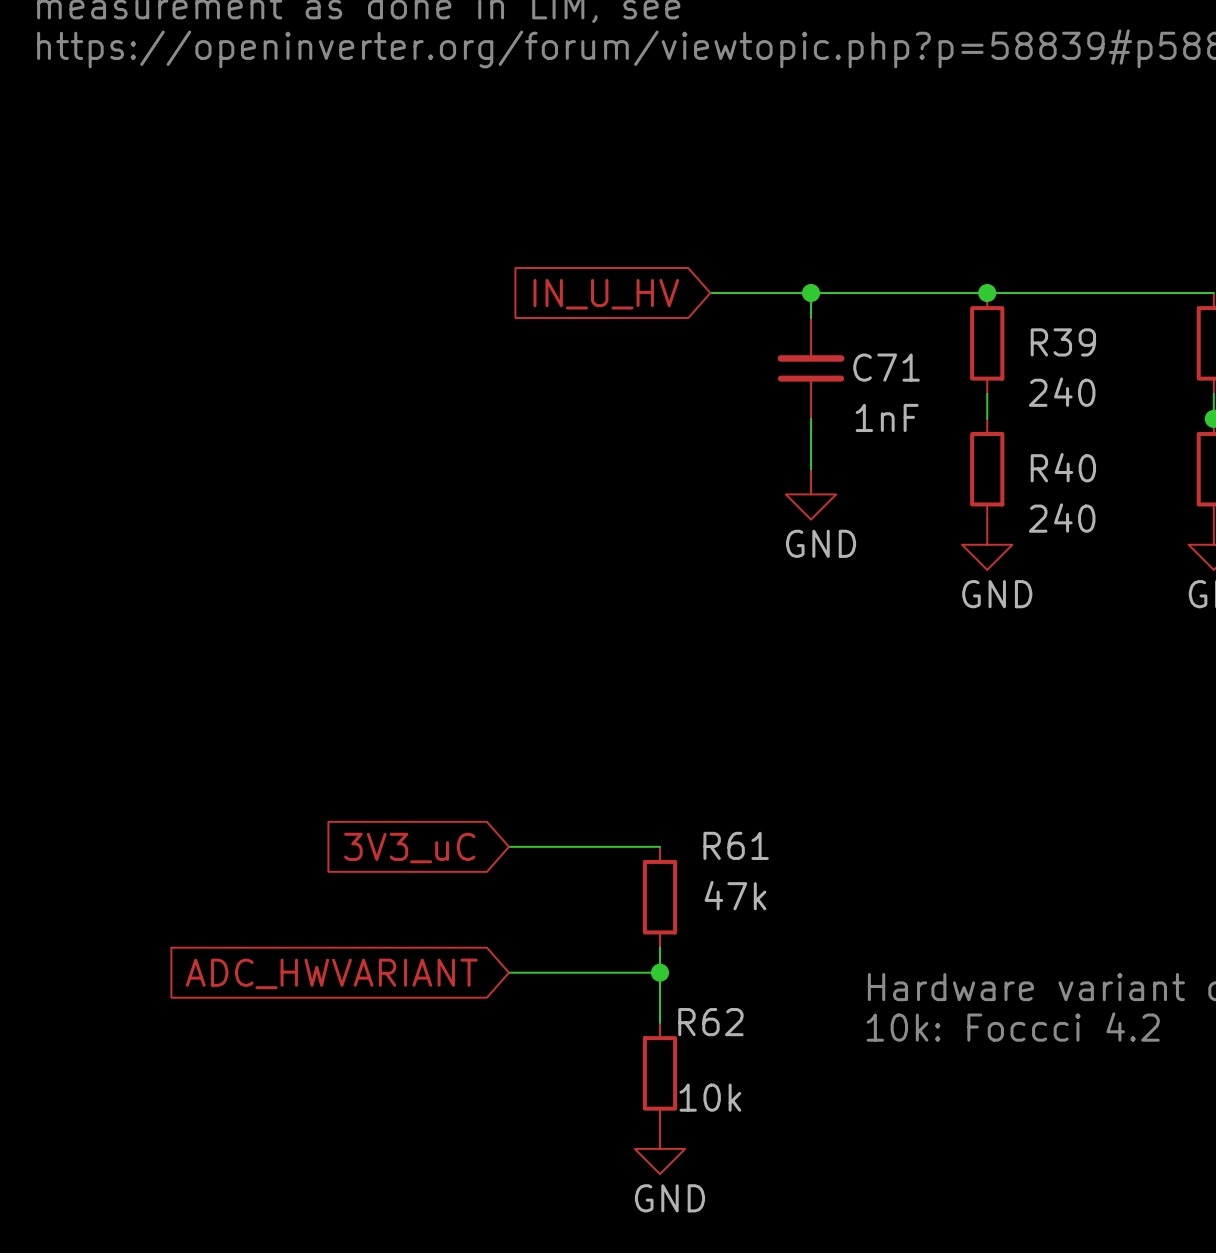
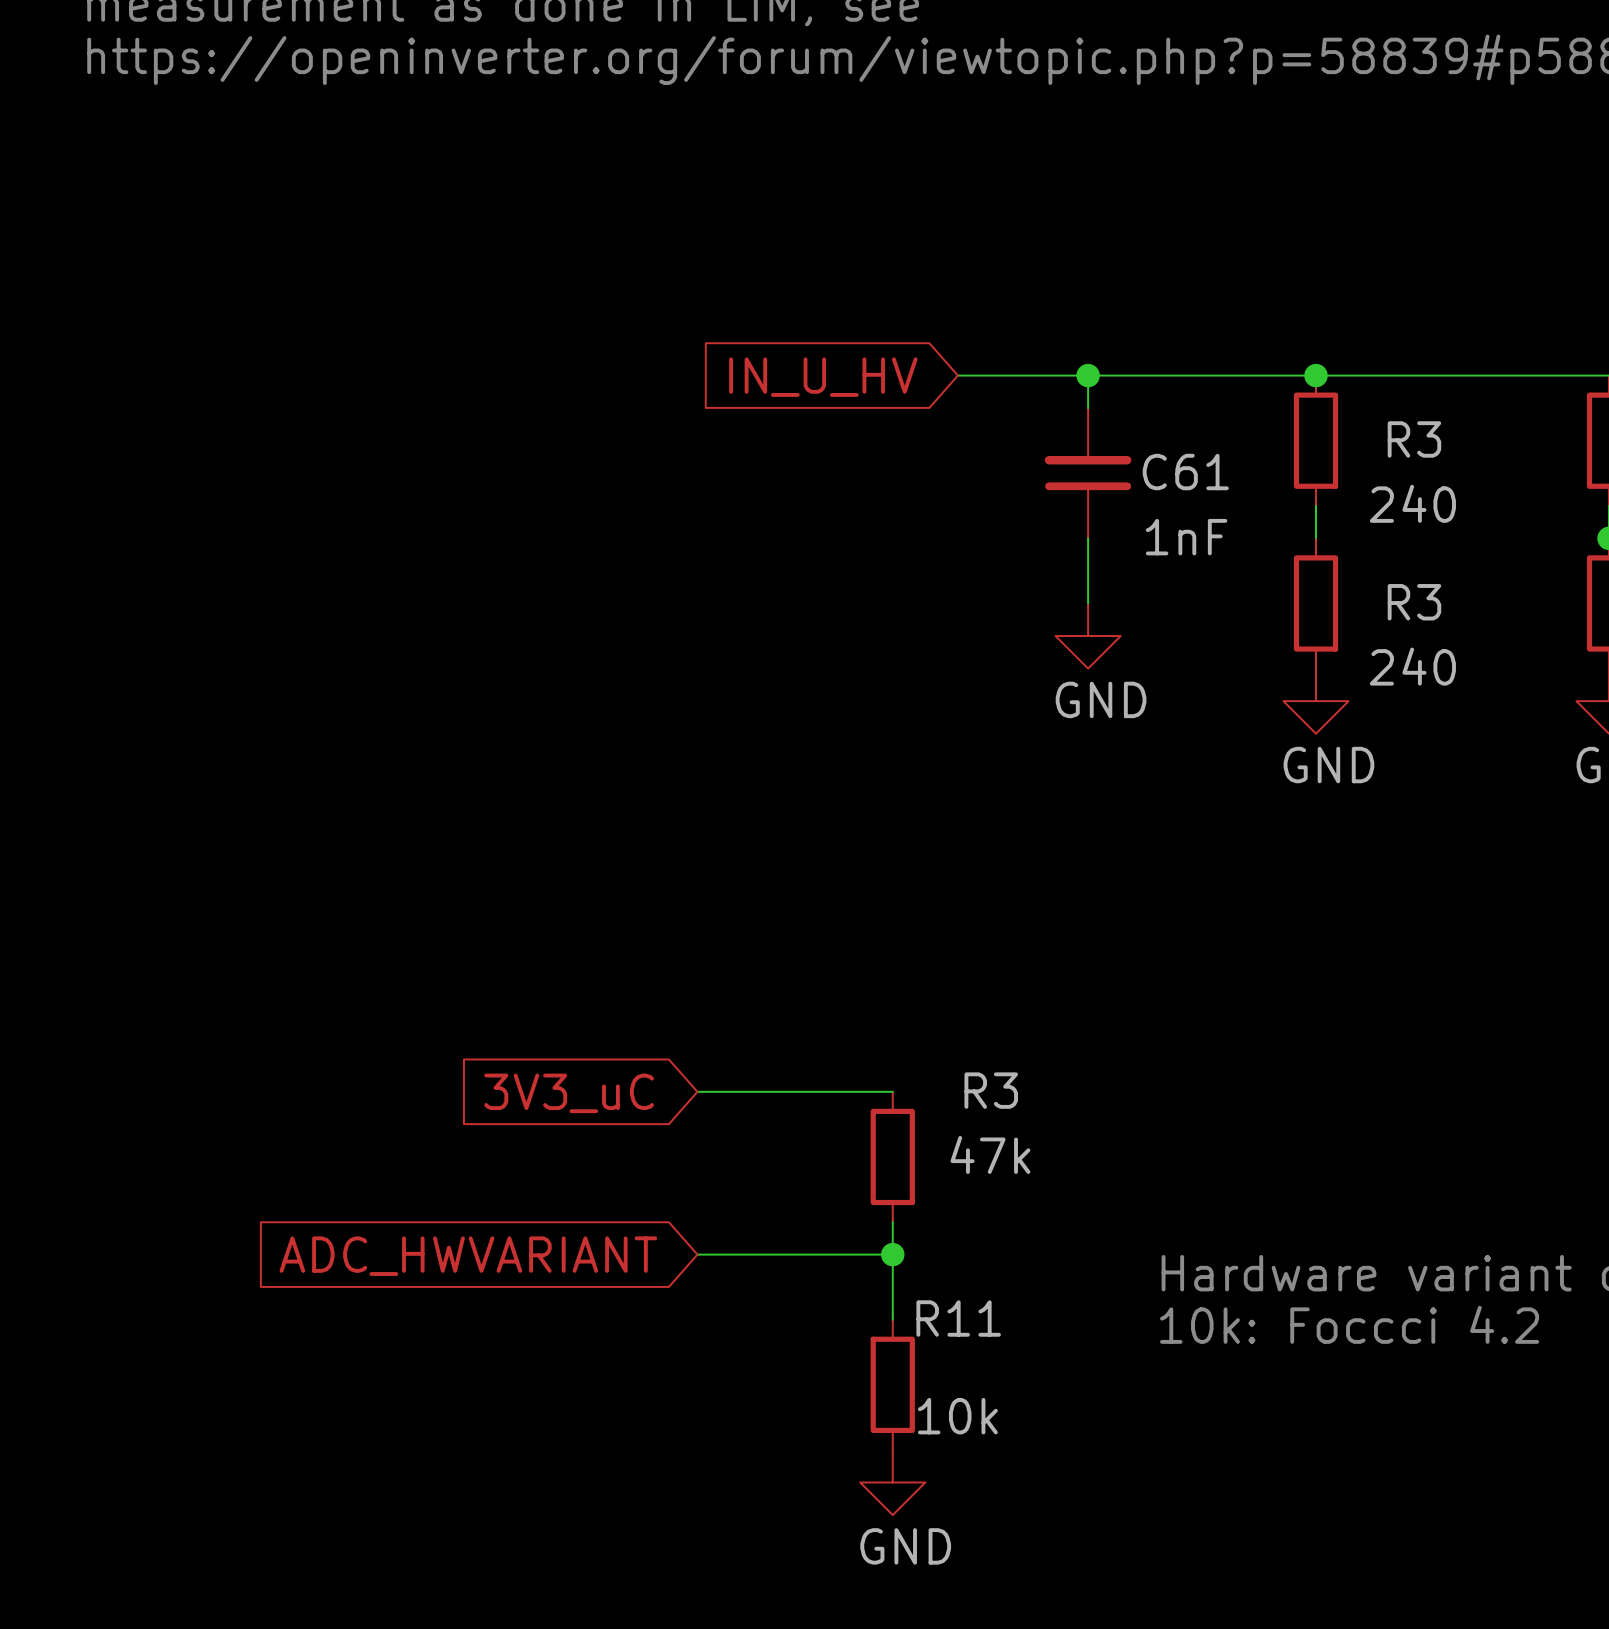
R39 name: R39 (1063, 342) -> R3 (1414, 439)
C71 name: C71 (886, 367) -> C61 (1185, 472)
R40 name: R40 (1063, 467) -> R3 (1414, 602)
R61 name: R61 (736, 845) -> R3 (991, 1090)
R62 name: R62 (710, 1022) -> R11 (958, 1318)

